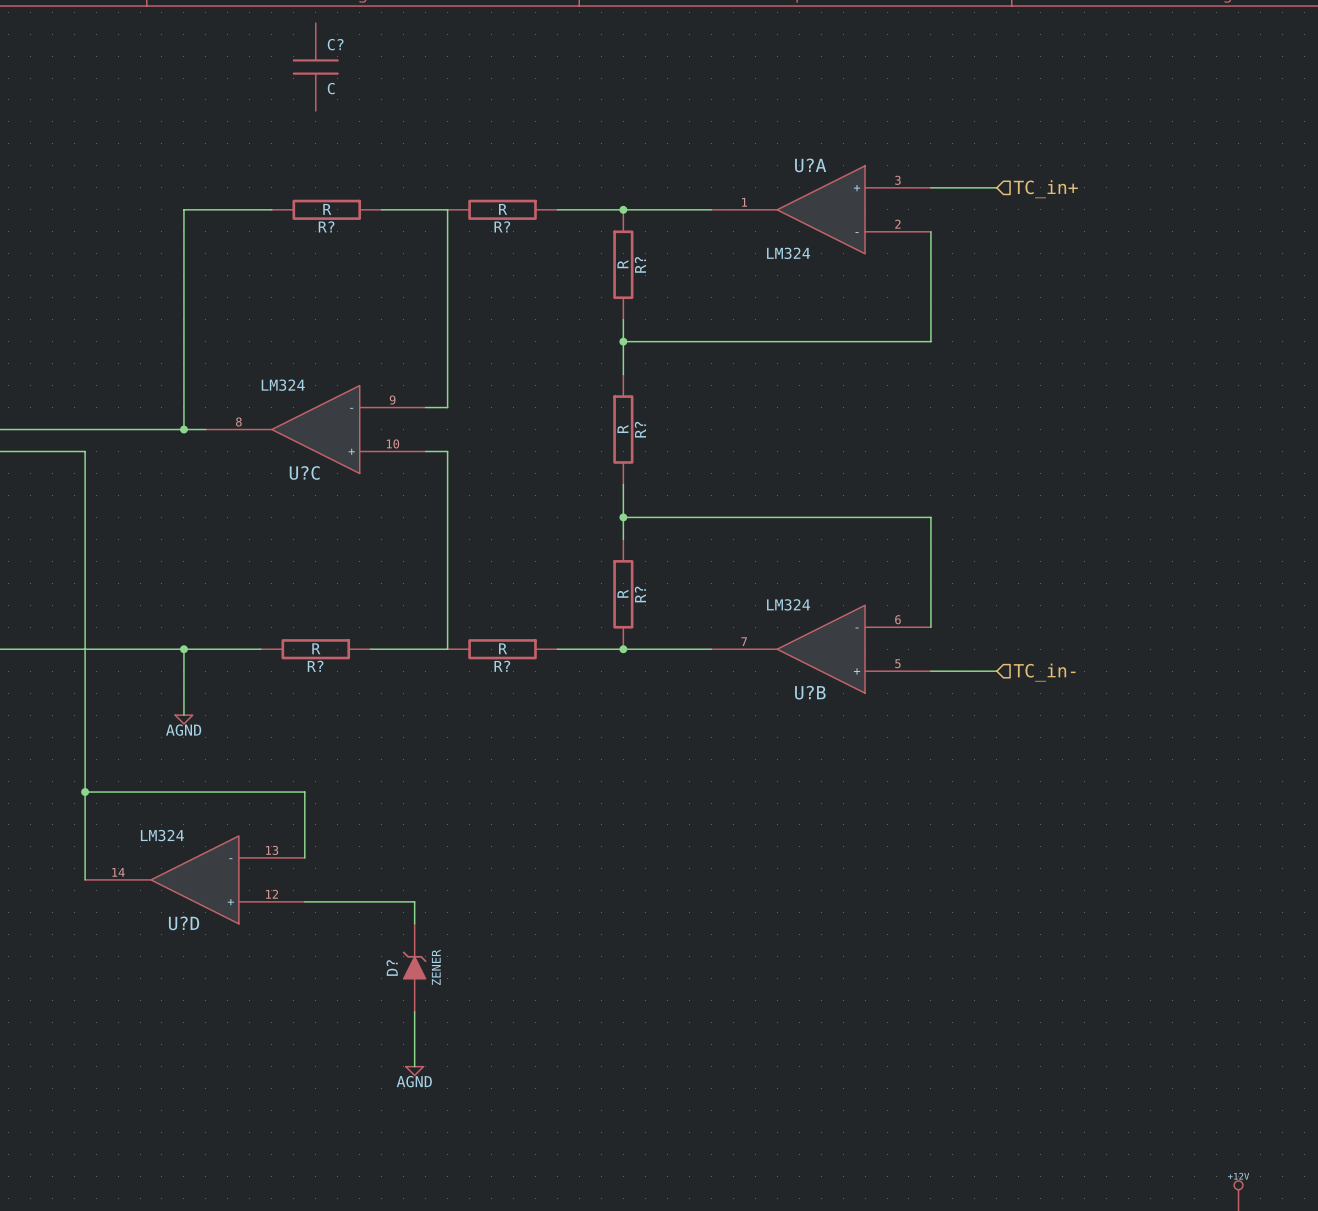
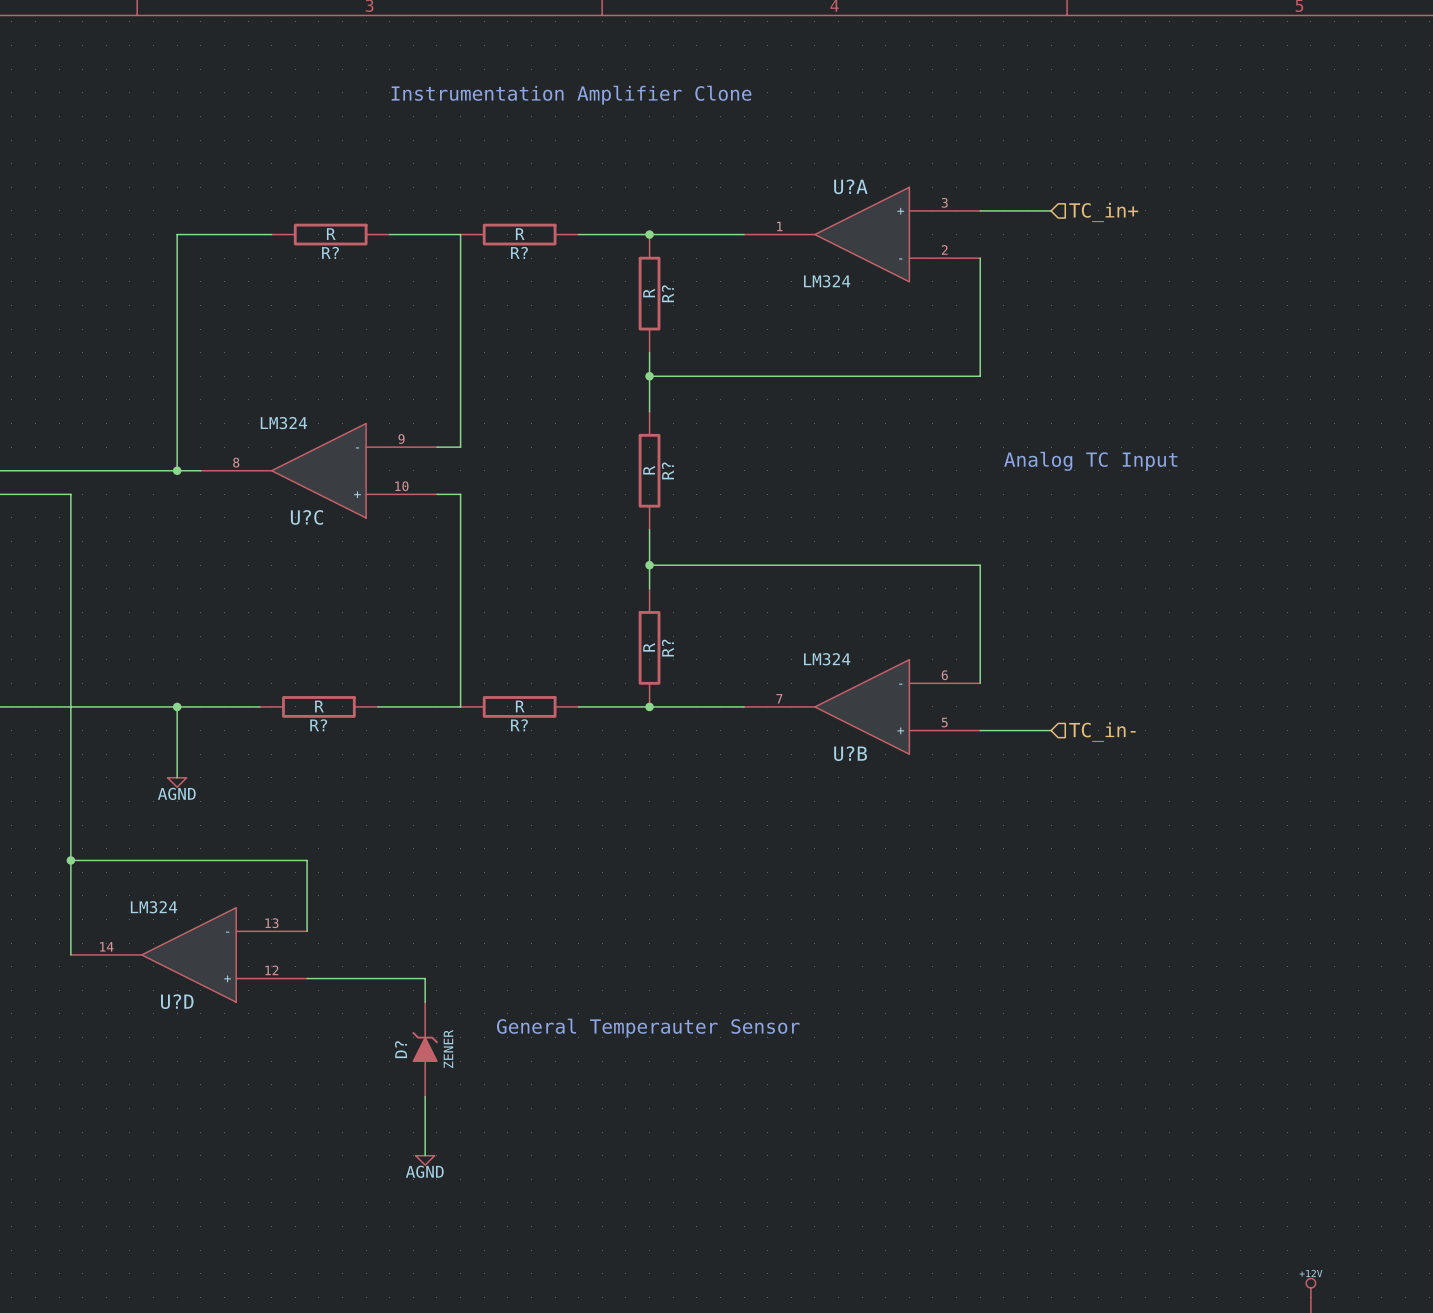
C?: C (315, 67) -> none
text: none -> Instrumentation Amplifier Clone (571, 95)
text: none -> Analog TC Input (1090, 461)
text: none -> General Temperauter Sensor (648, 1028)

